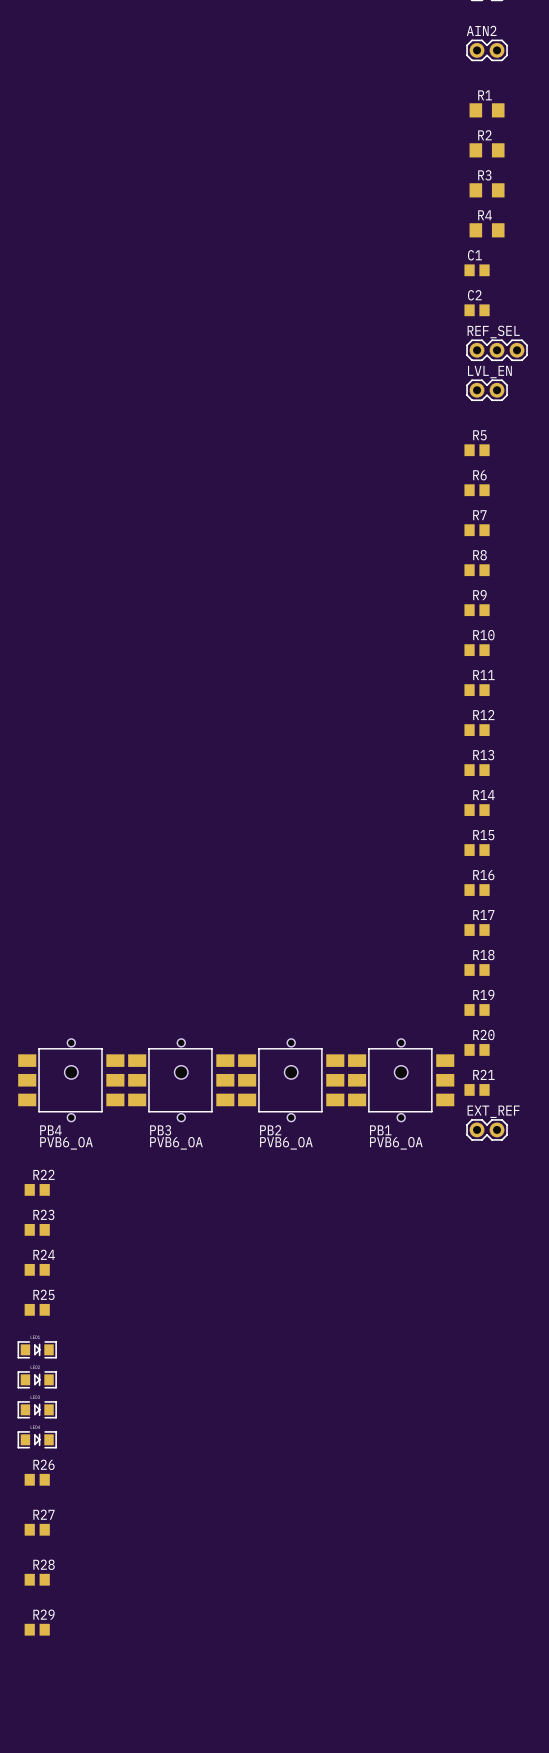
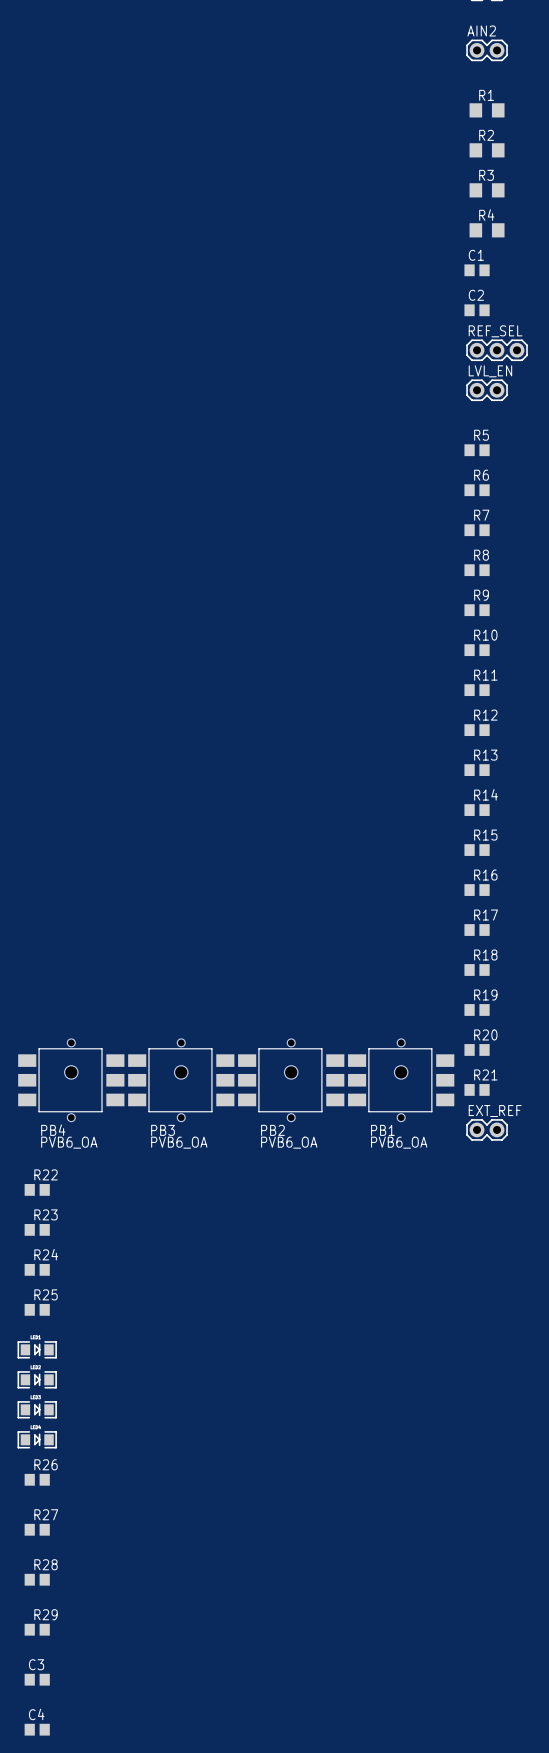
C3: none -> (37, 1679)
C4: none -> (37, 1729)

